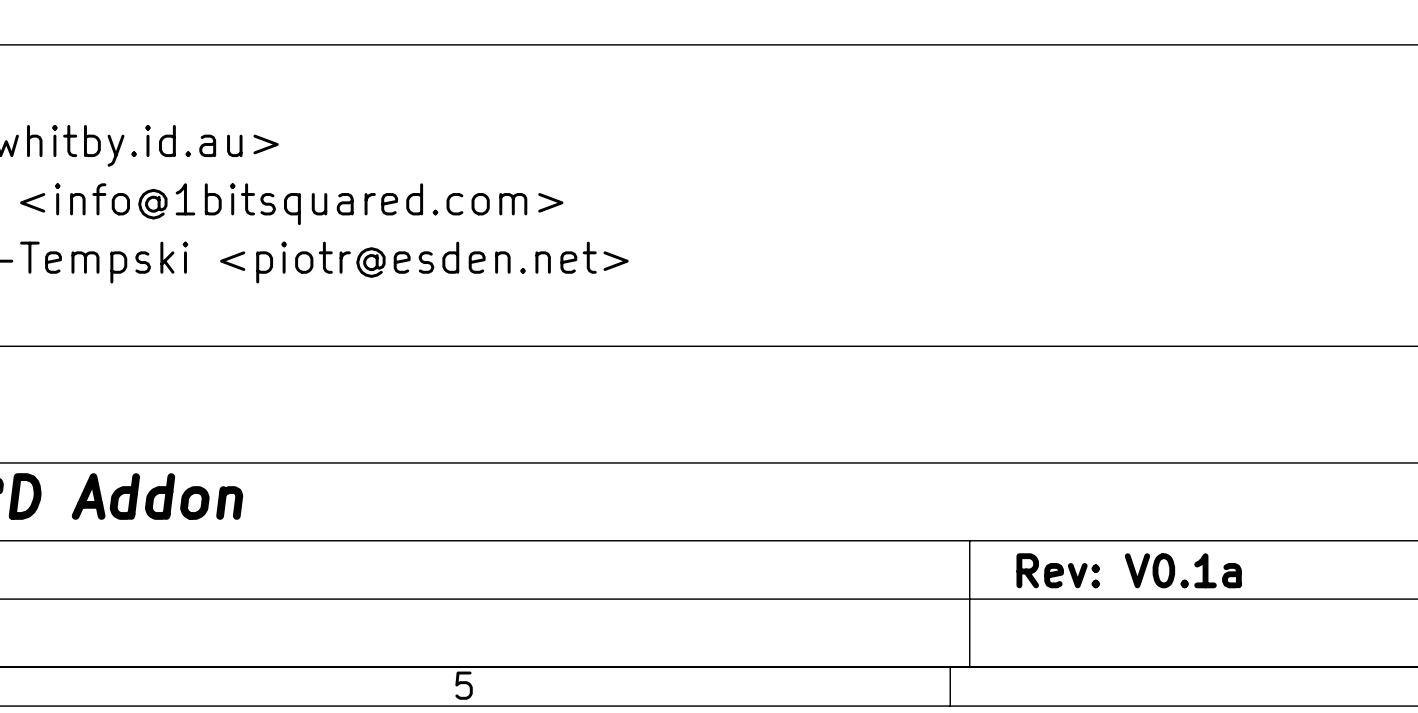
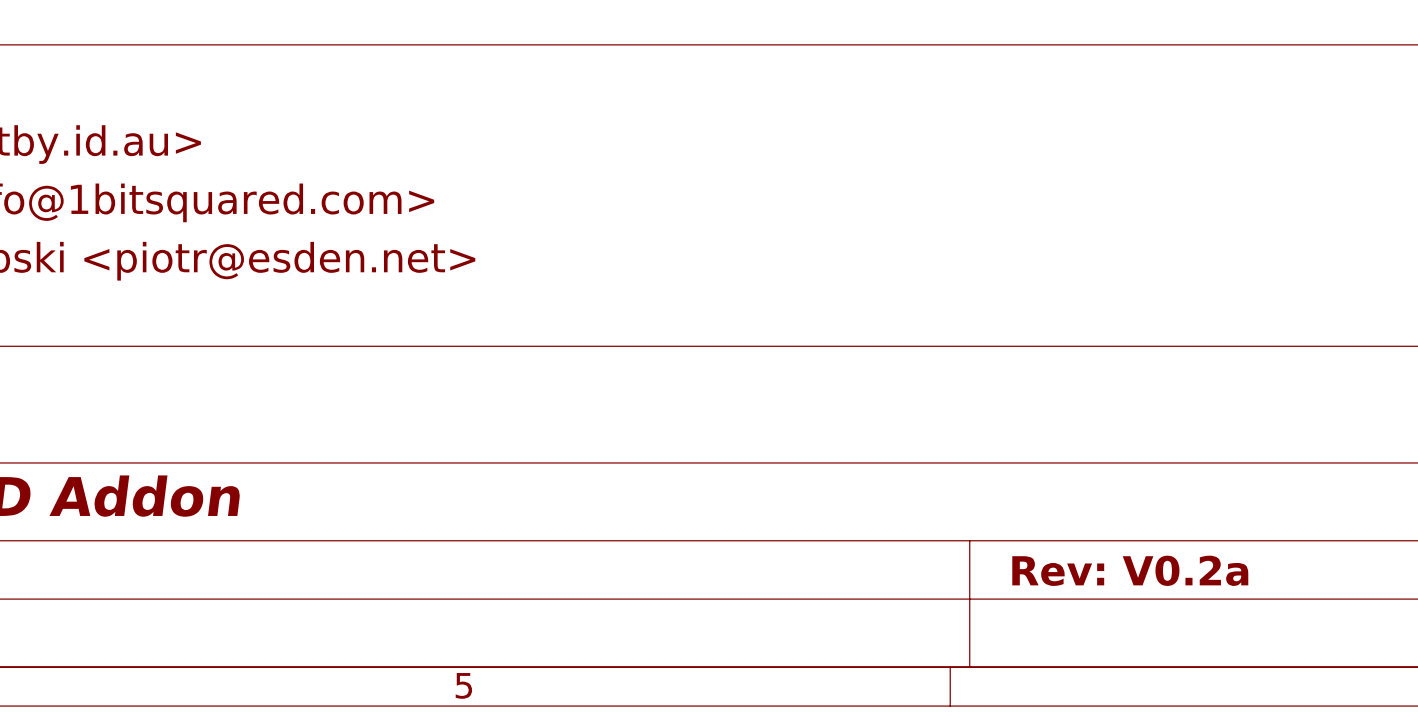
title block: Rev: V0.1a (1129, 570) -> Rev: V0.2a (1130, 570)

